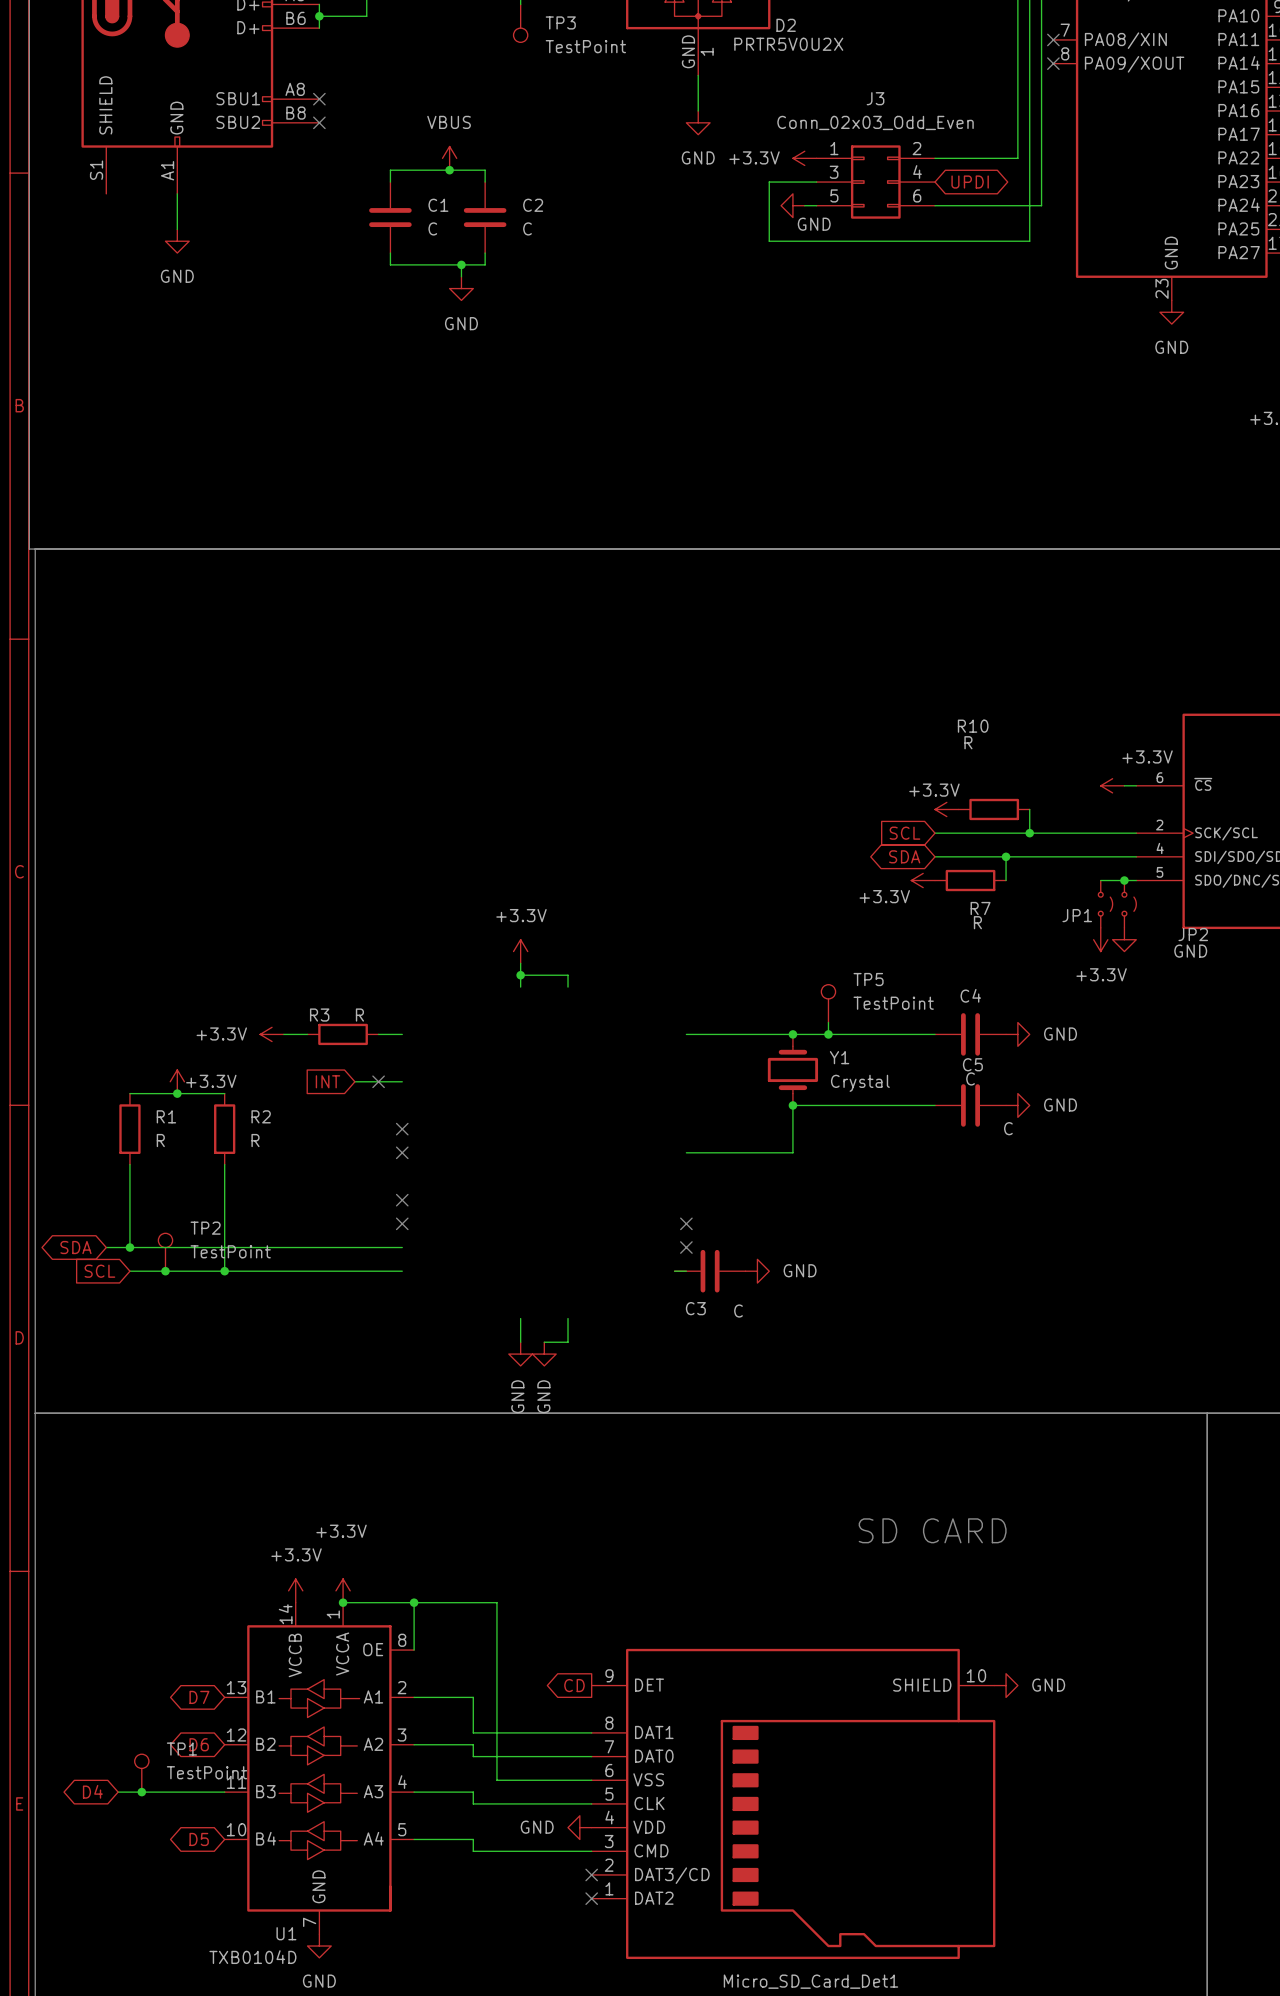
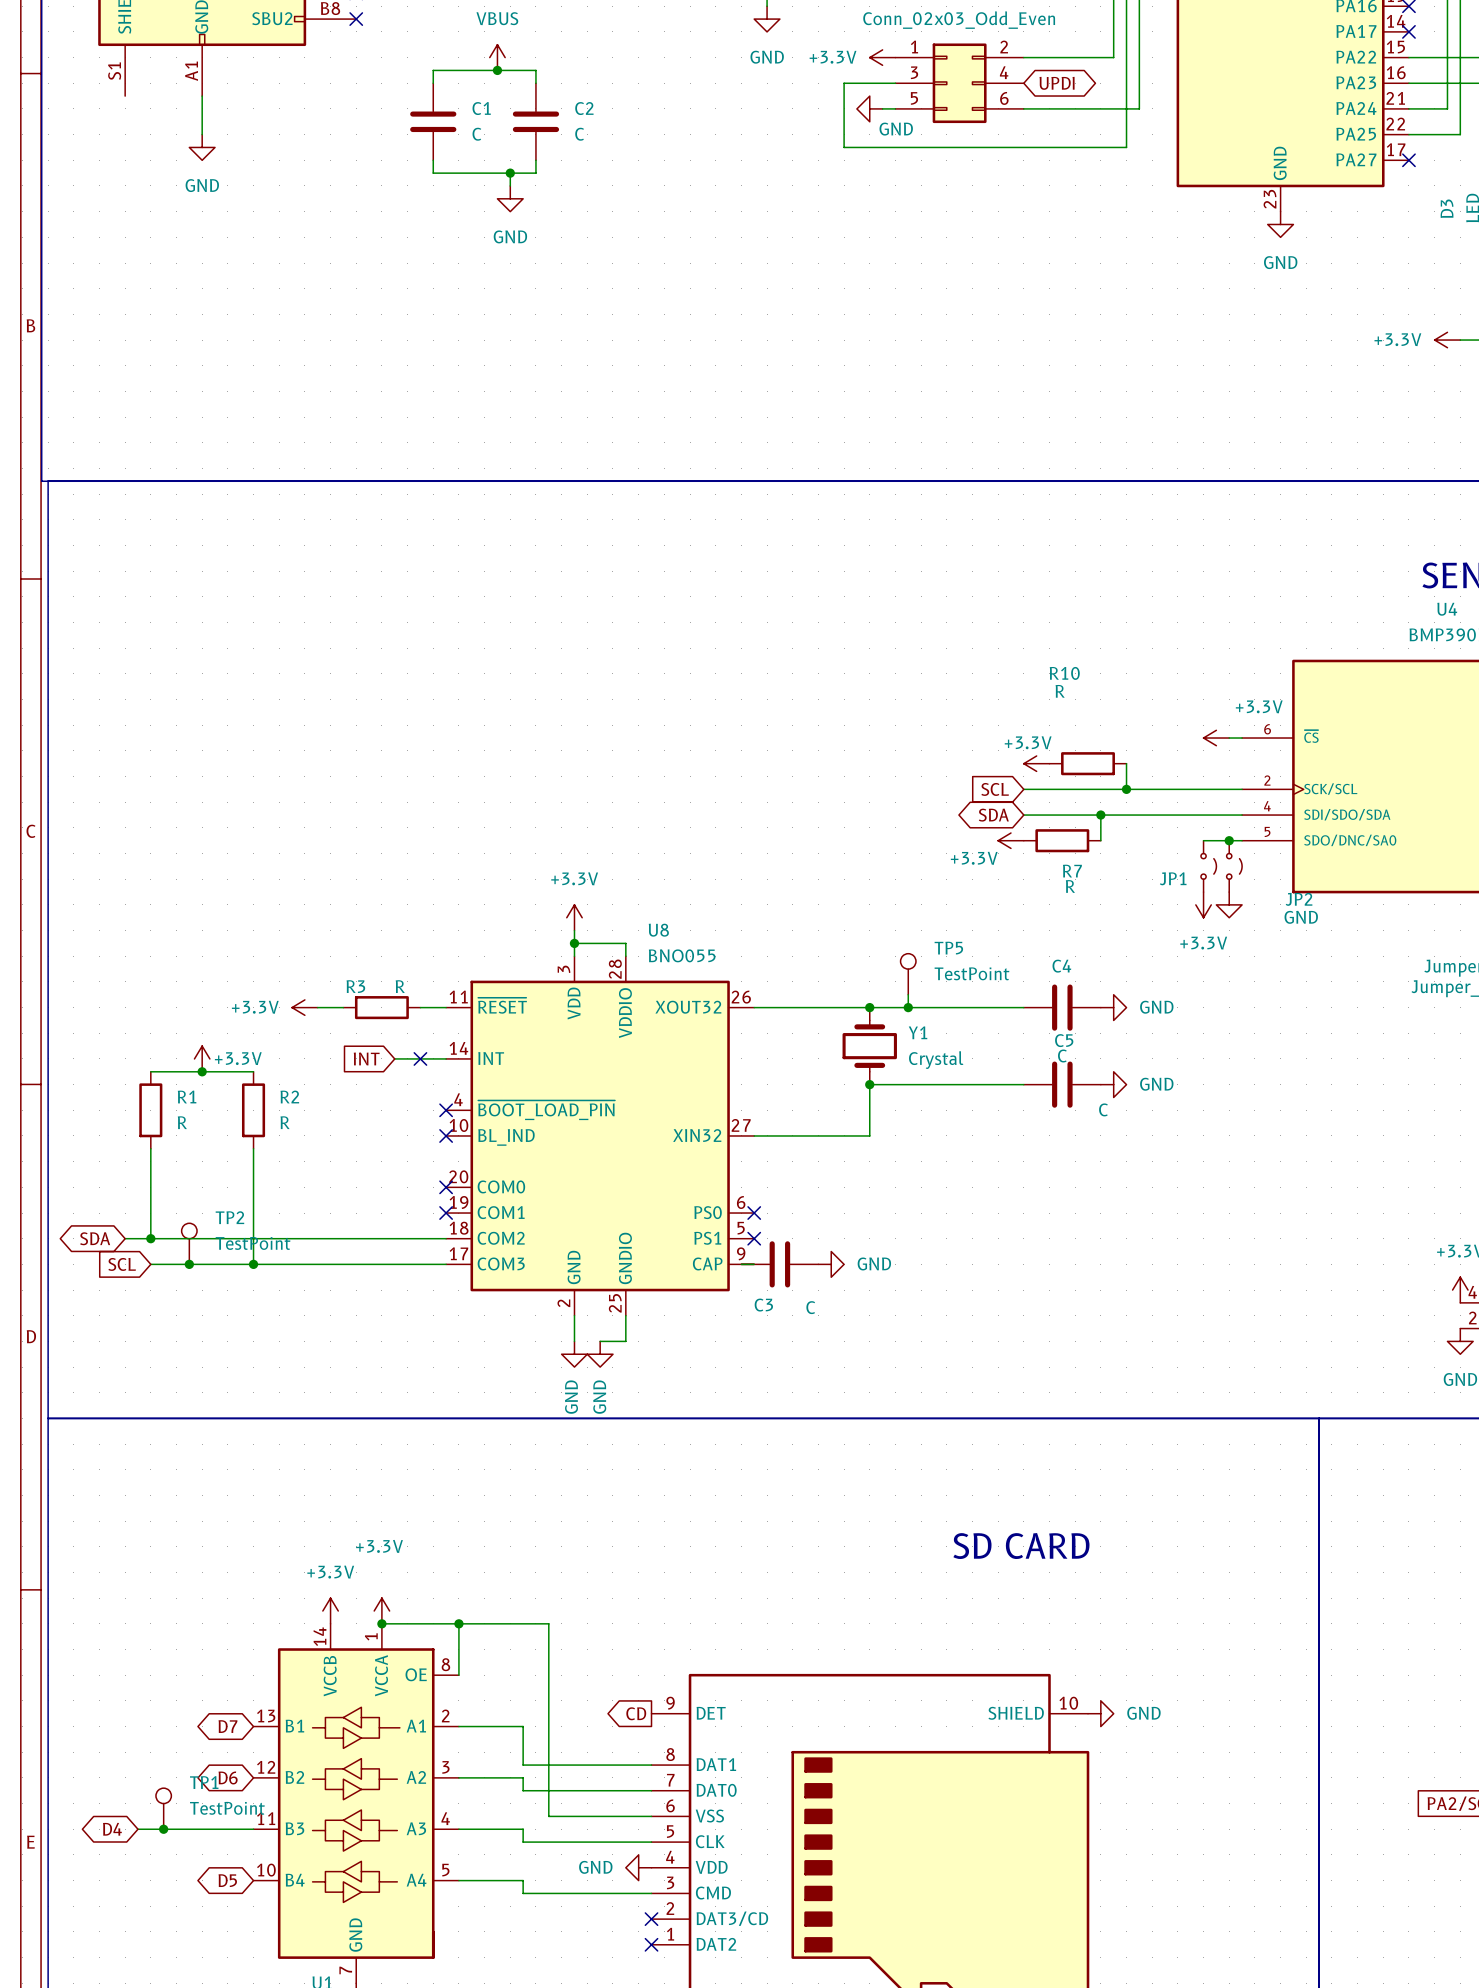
U8: none -> BNO055 (600, 1135)

